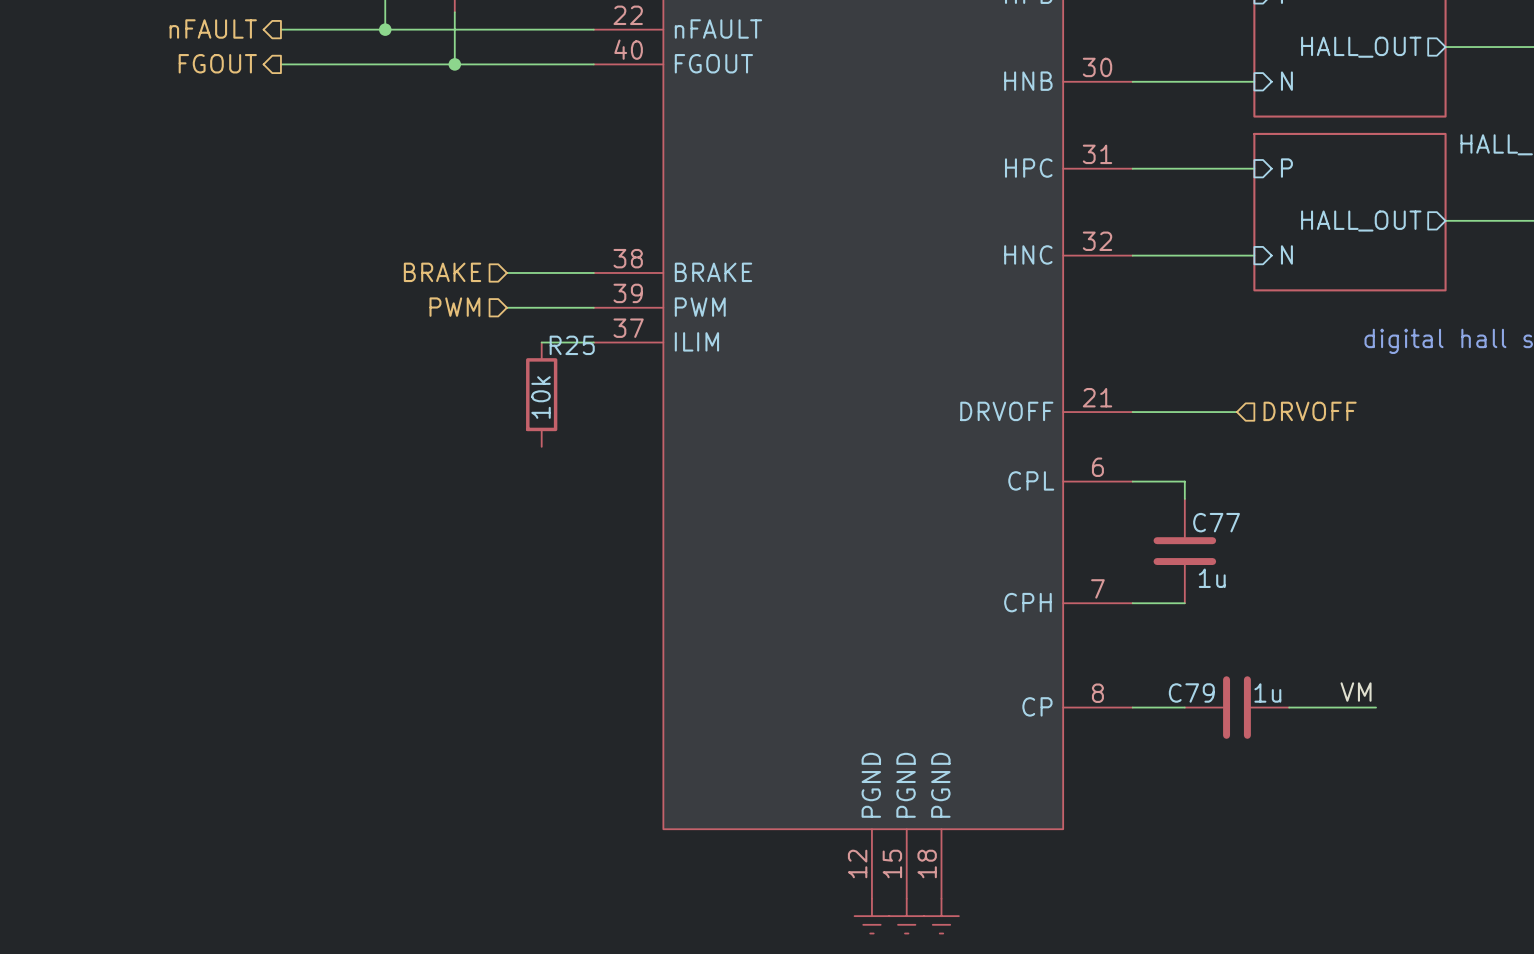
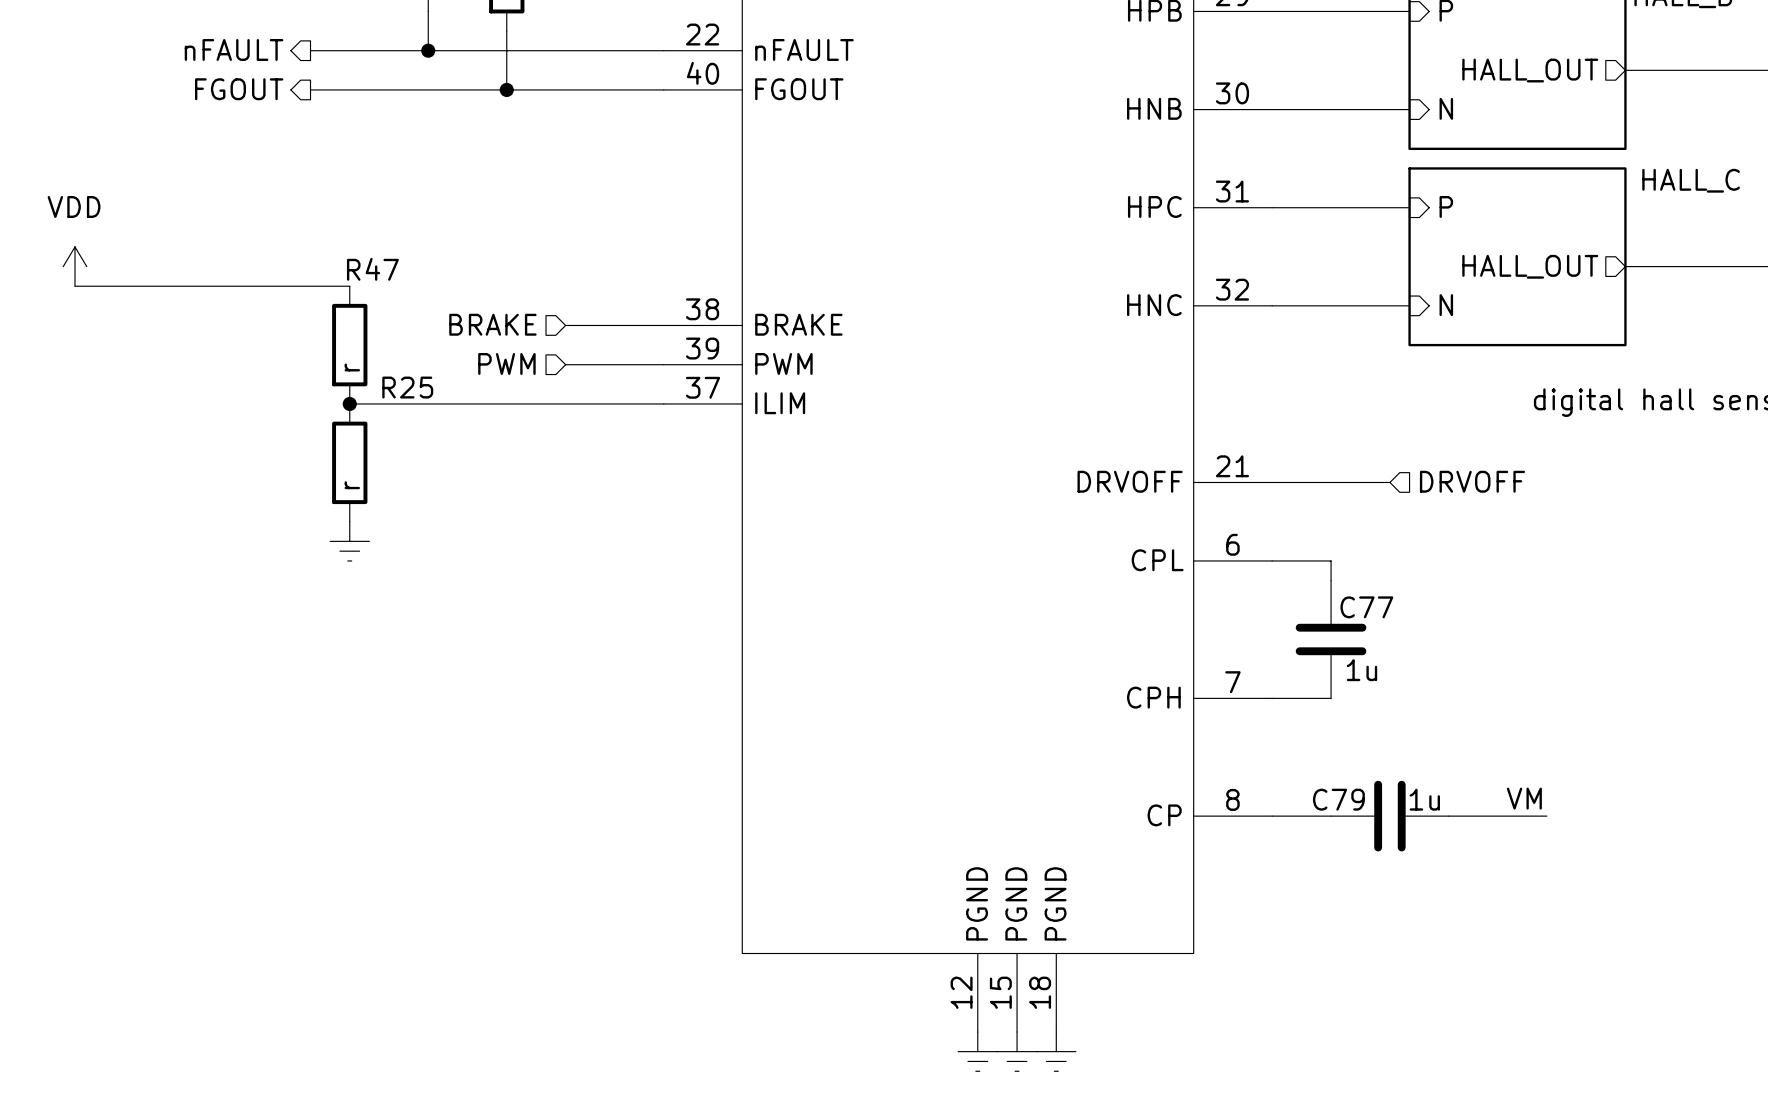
power symbol: none -> VDD (75, 266)
wire: none -> (75, 286) (349, 286)
R47: none -> r (349, 345)
wire: none -> (349, 403) (604, 403)
junction: none -> (349, 403)
R25 name position: R25 (572, 345) -> R25 (407, 387)
R25 position: (541, 394) -> (349, 462)
R25 value: 10k (541, 397) -> r (352, 485)
power symbol: none -> (349, 541)

